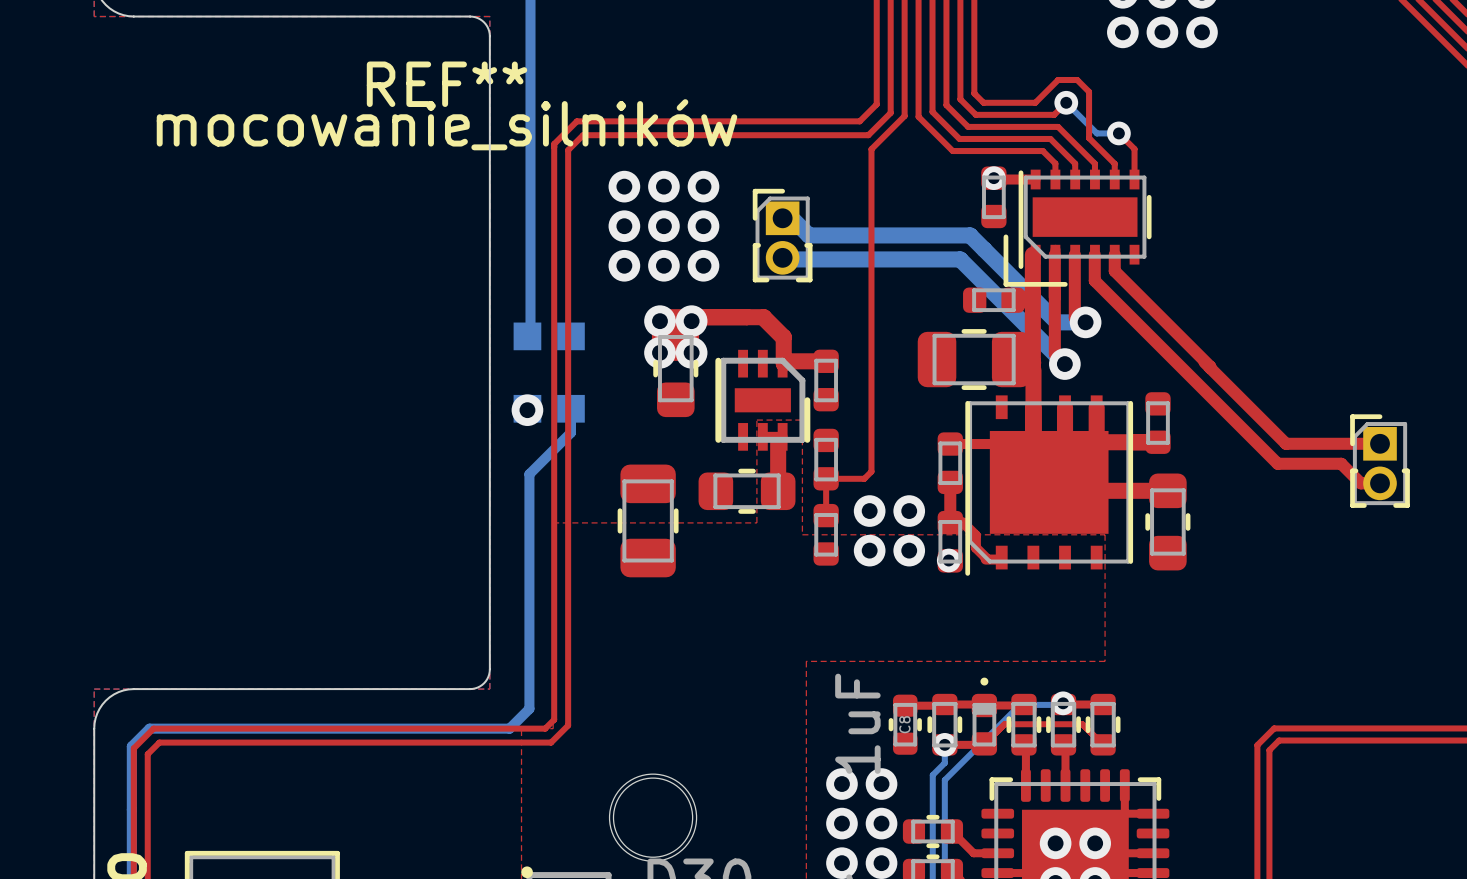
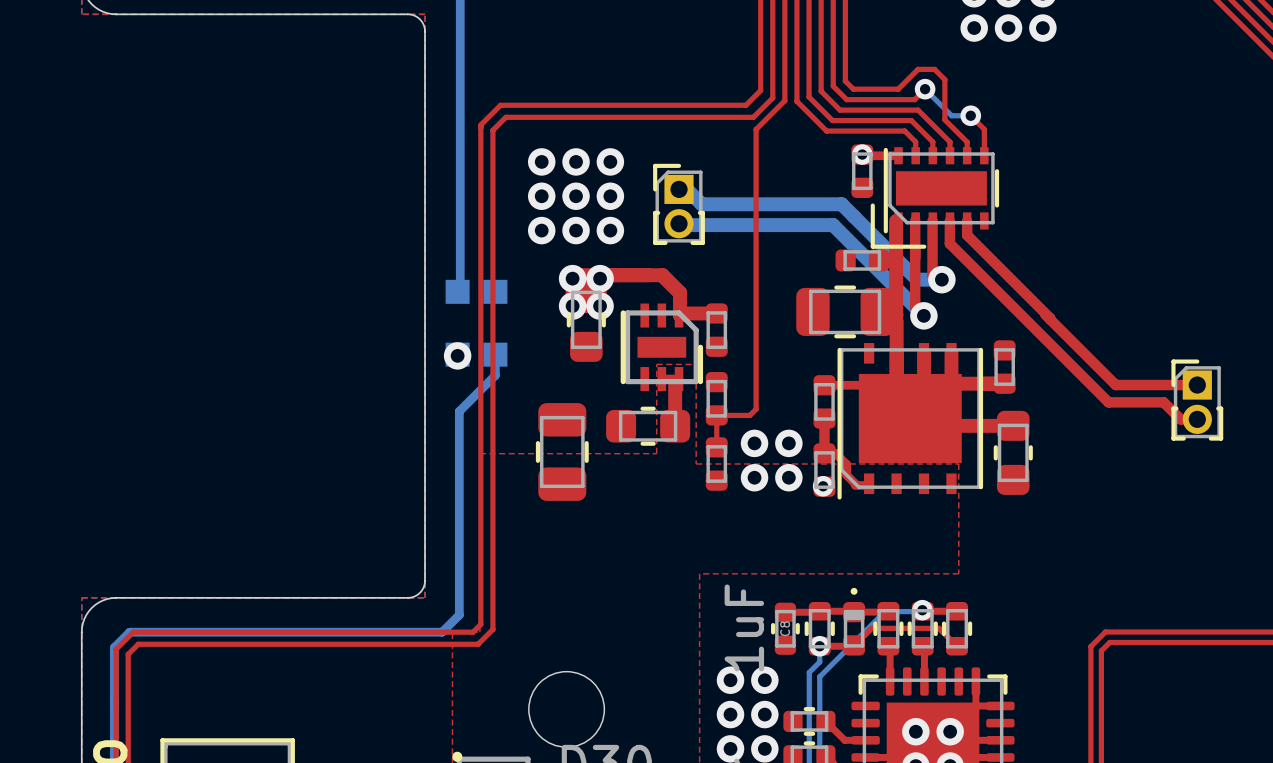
REF**: mocowanie_silników (653, 817) -> none

